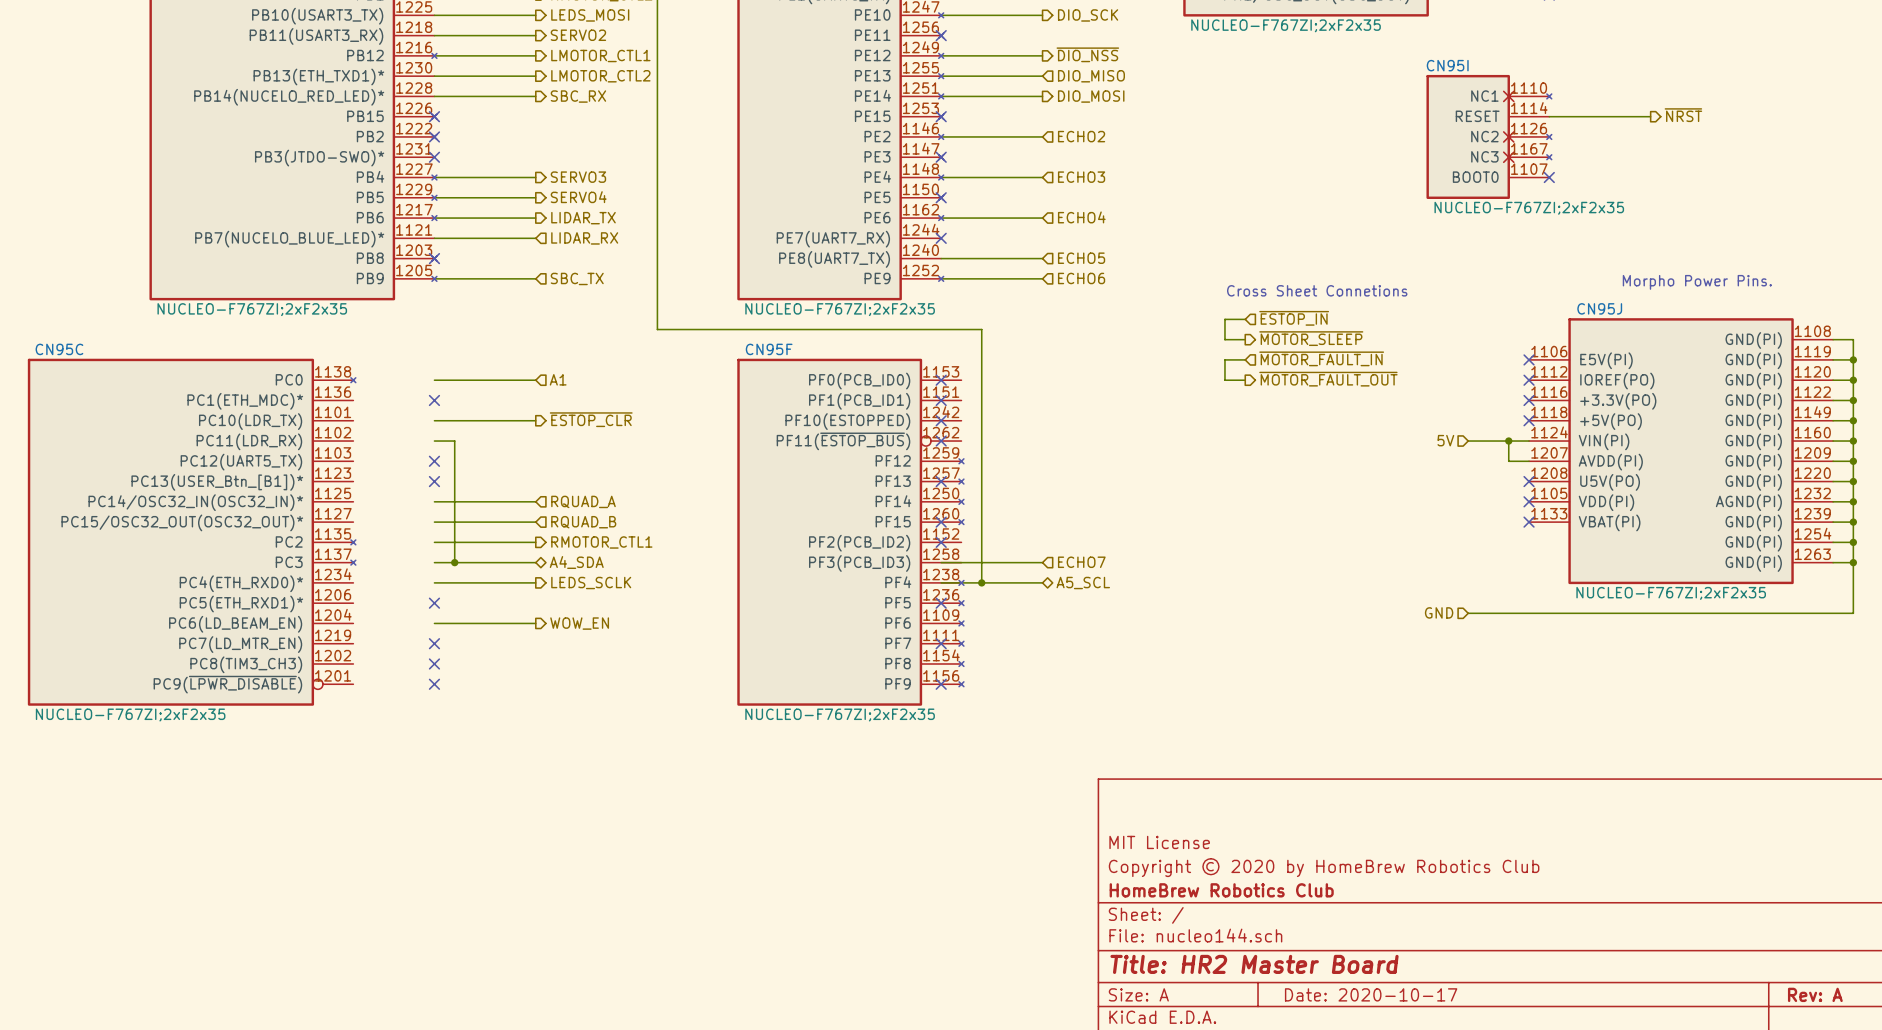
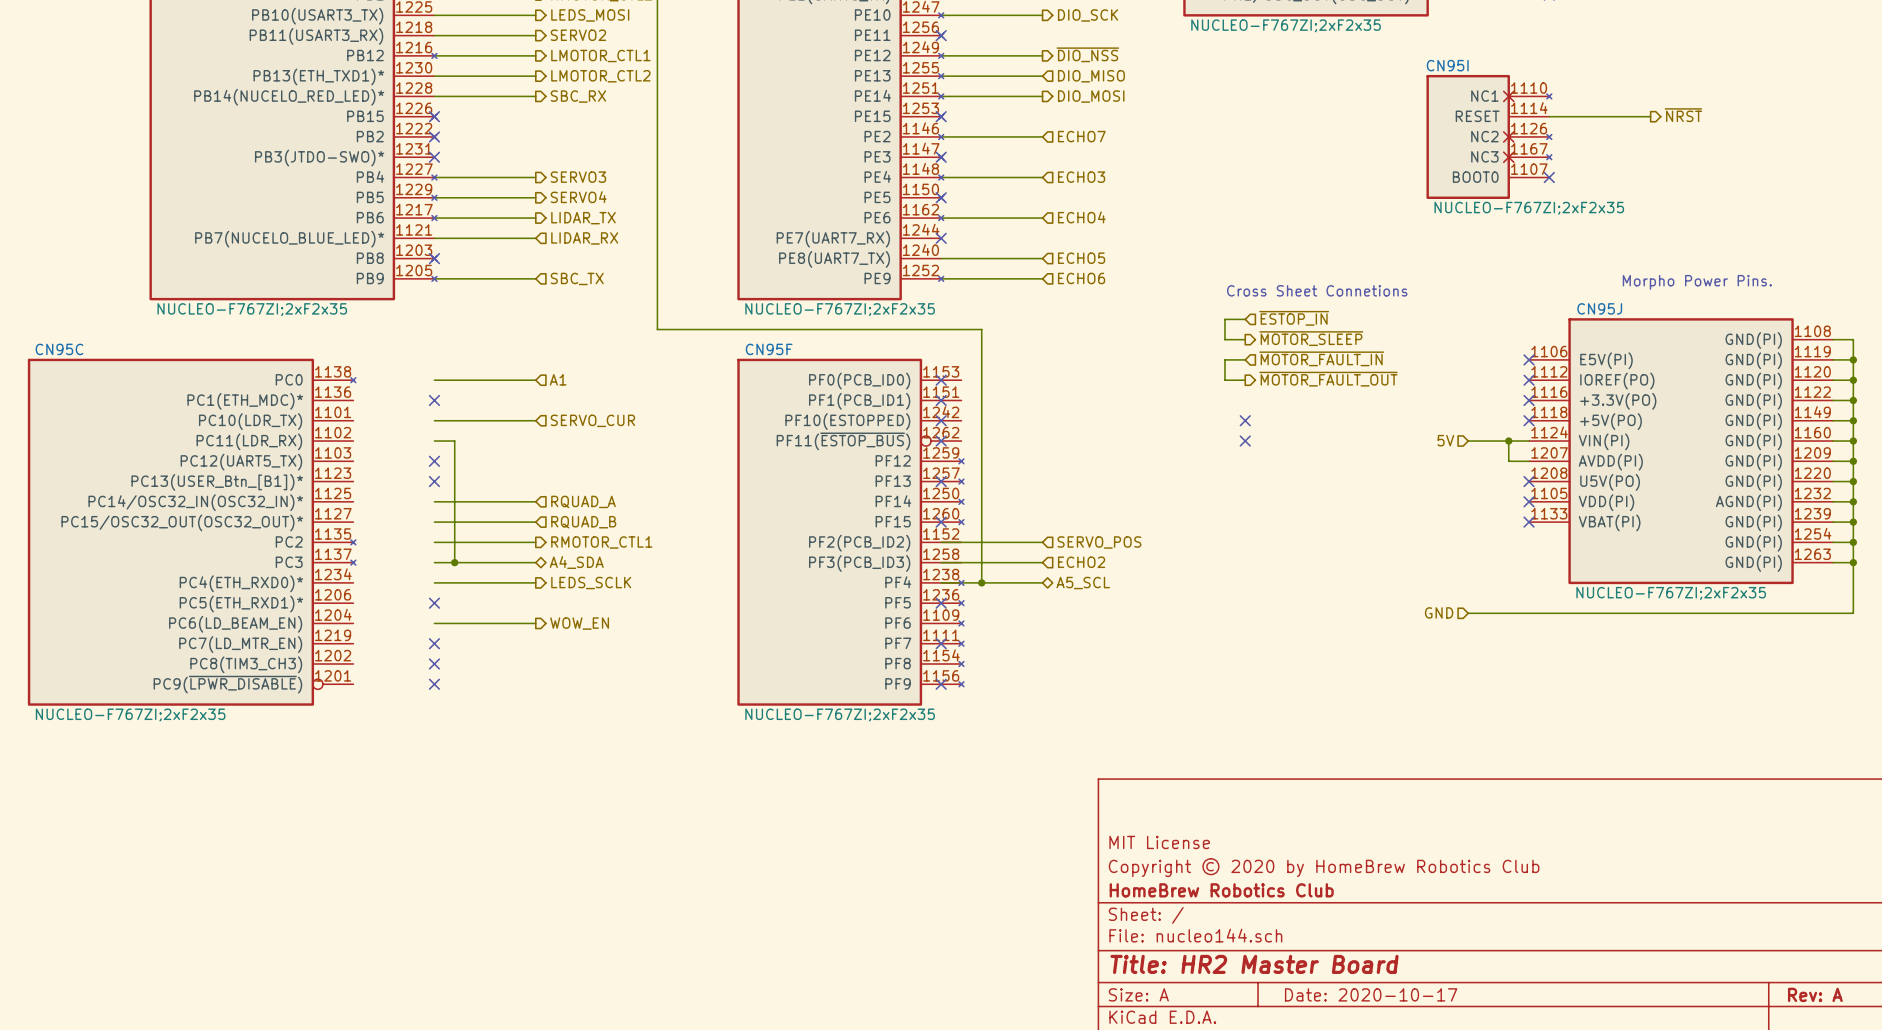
hierarchical label: ECHO2 (1081, 136) -> ECHO7 (1081, 136)
hierarchical label shape: output (591, 419) -> input (592, 420)
hierarchical label: ~{ESTOP_CLR} (591, 419) -> SERVO_CUR (592, 420)
no-connect mark: none -> (1245, 420)
no-connect mark: none -> (1245, 441)
wire: none -> (941, 542) (1042, 542)
no-connect mark: (941, 542) -> none
hierarchical label: none -> SERVO_POS (1099, 542)
hierarchical label: ECHO7 (1081, 562) -> ECHO2 (1081, 562)

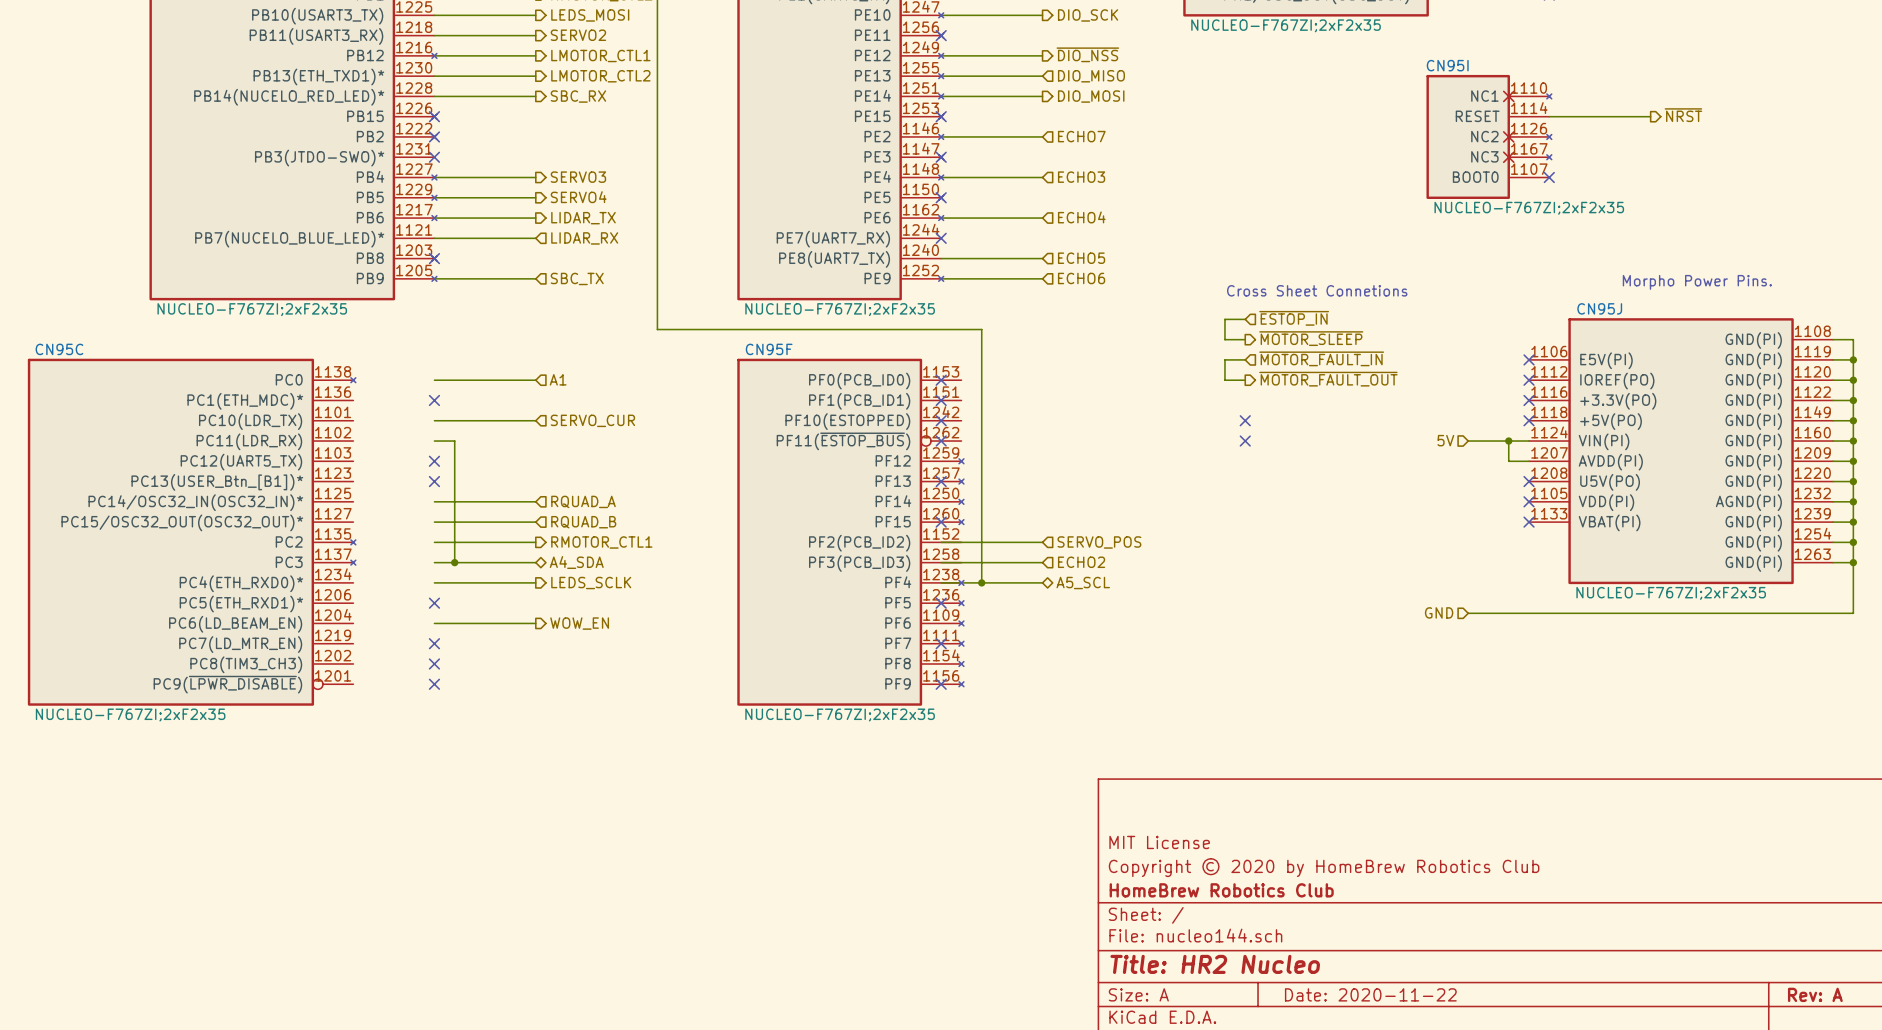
title block: Title: HR2 Master Board (1254, 964) -> Title: HR2 Nucleo (1215, 964)
title block: Date: 2020-10-17 (1371, 994) -> Date: 2020-11-22 (1370, 994)

